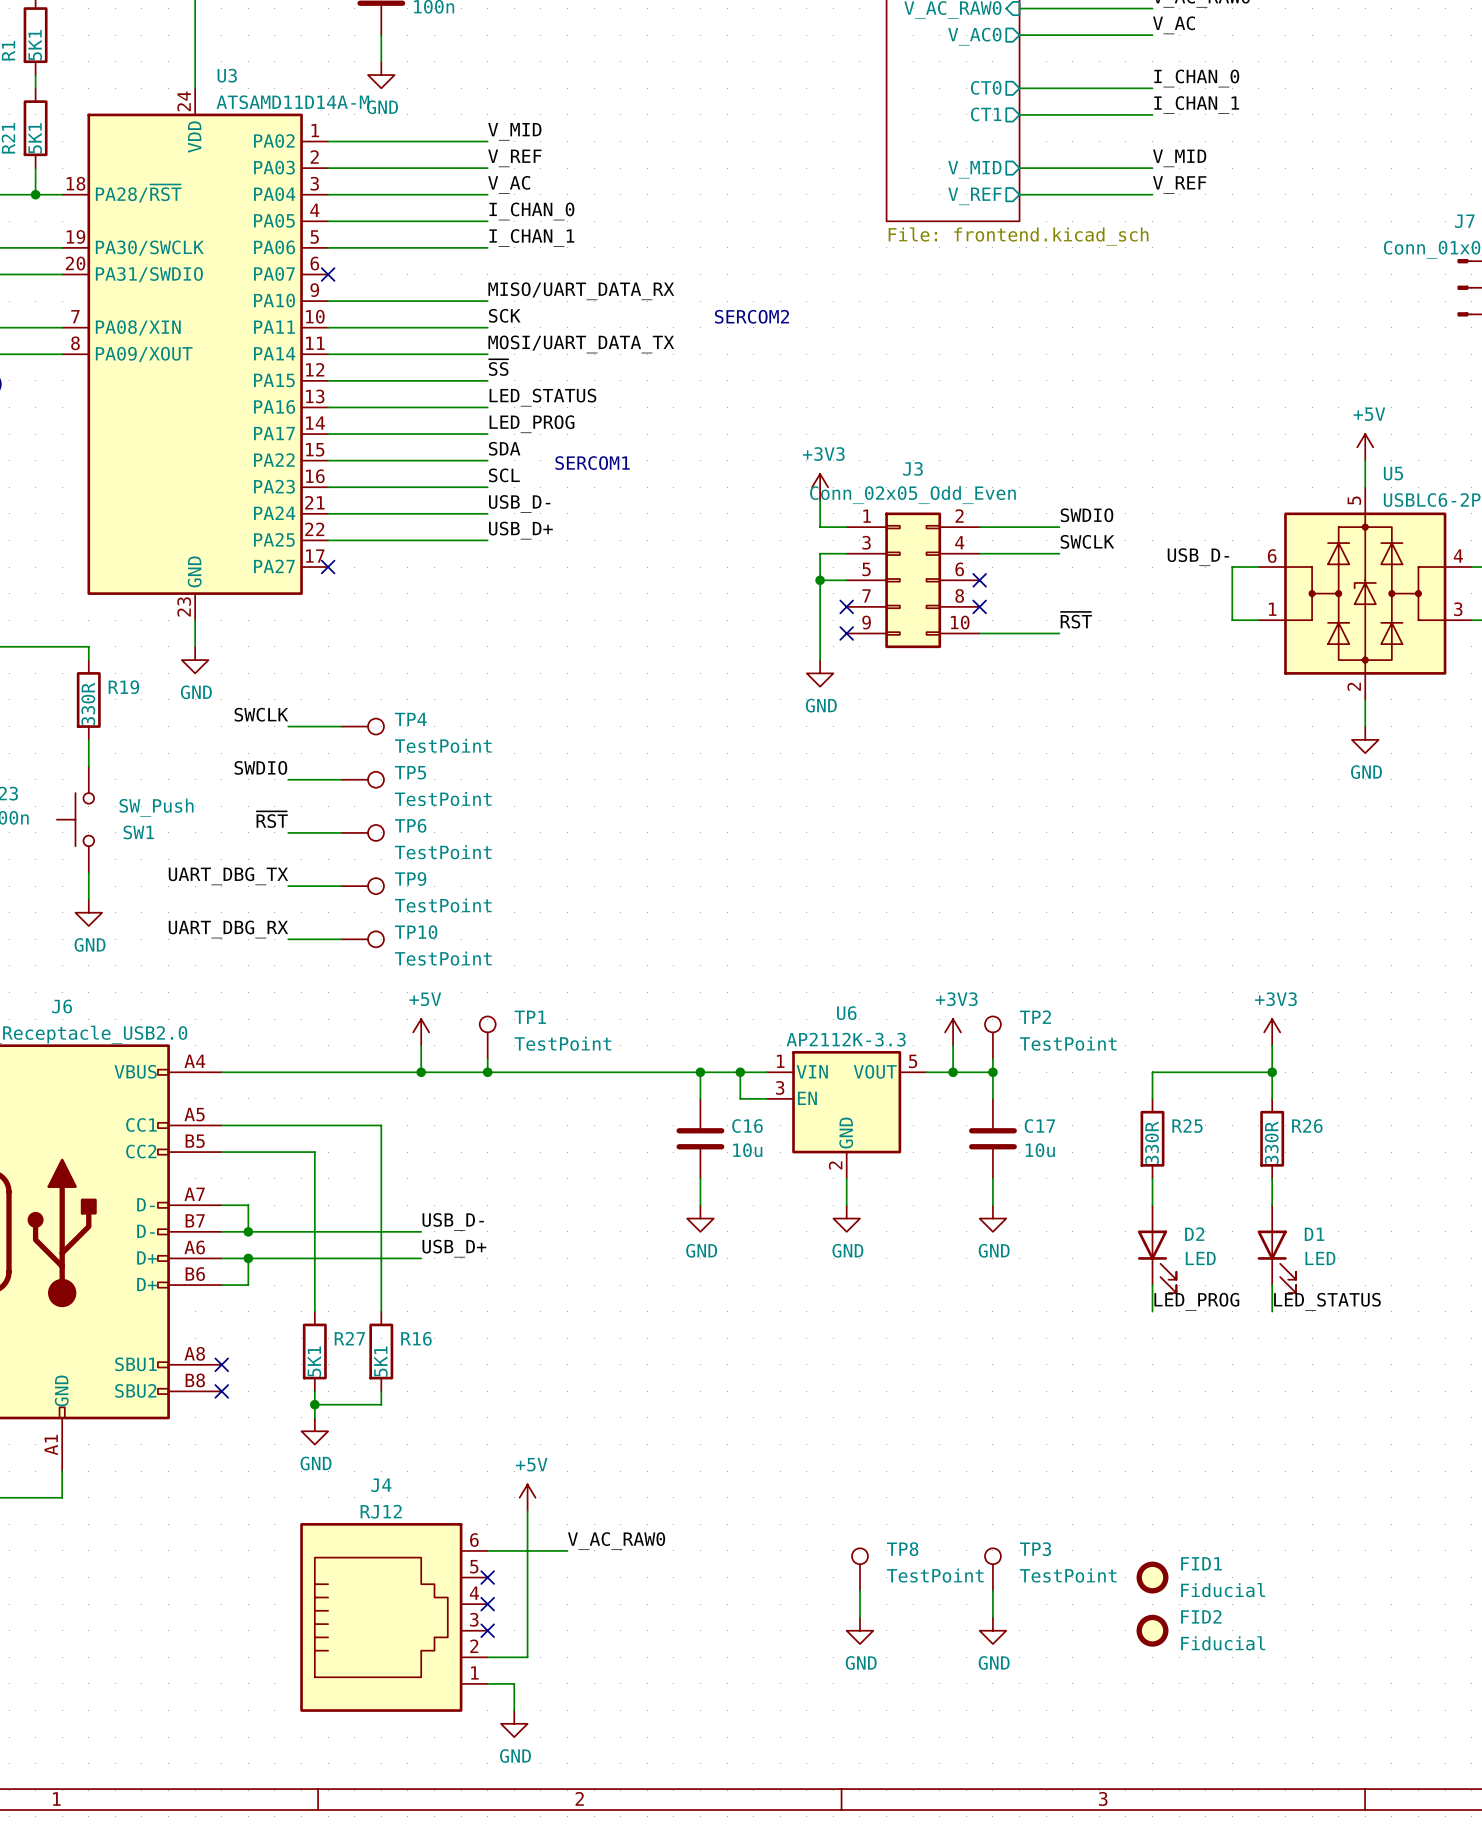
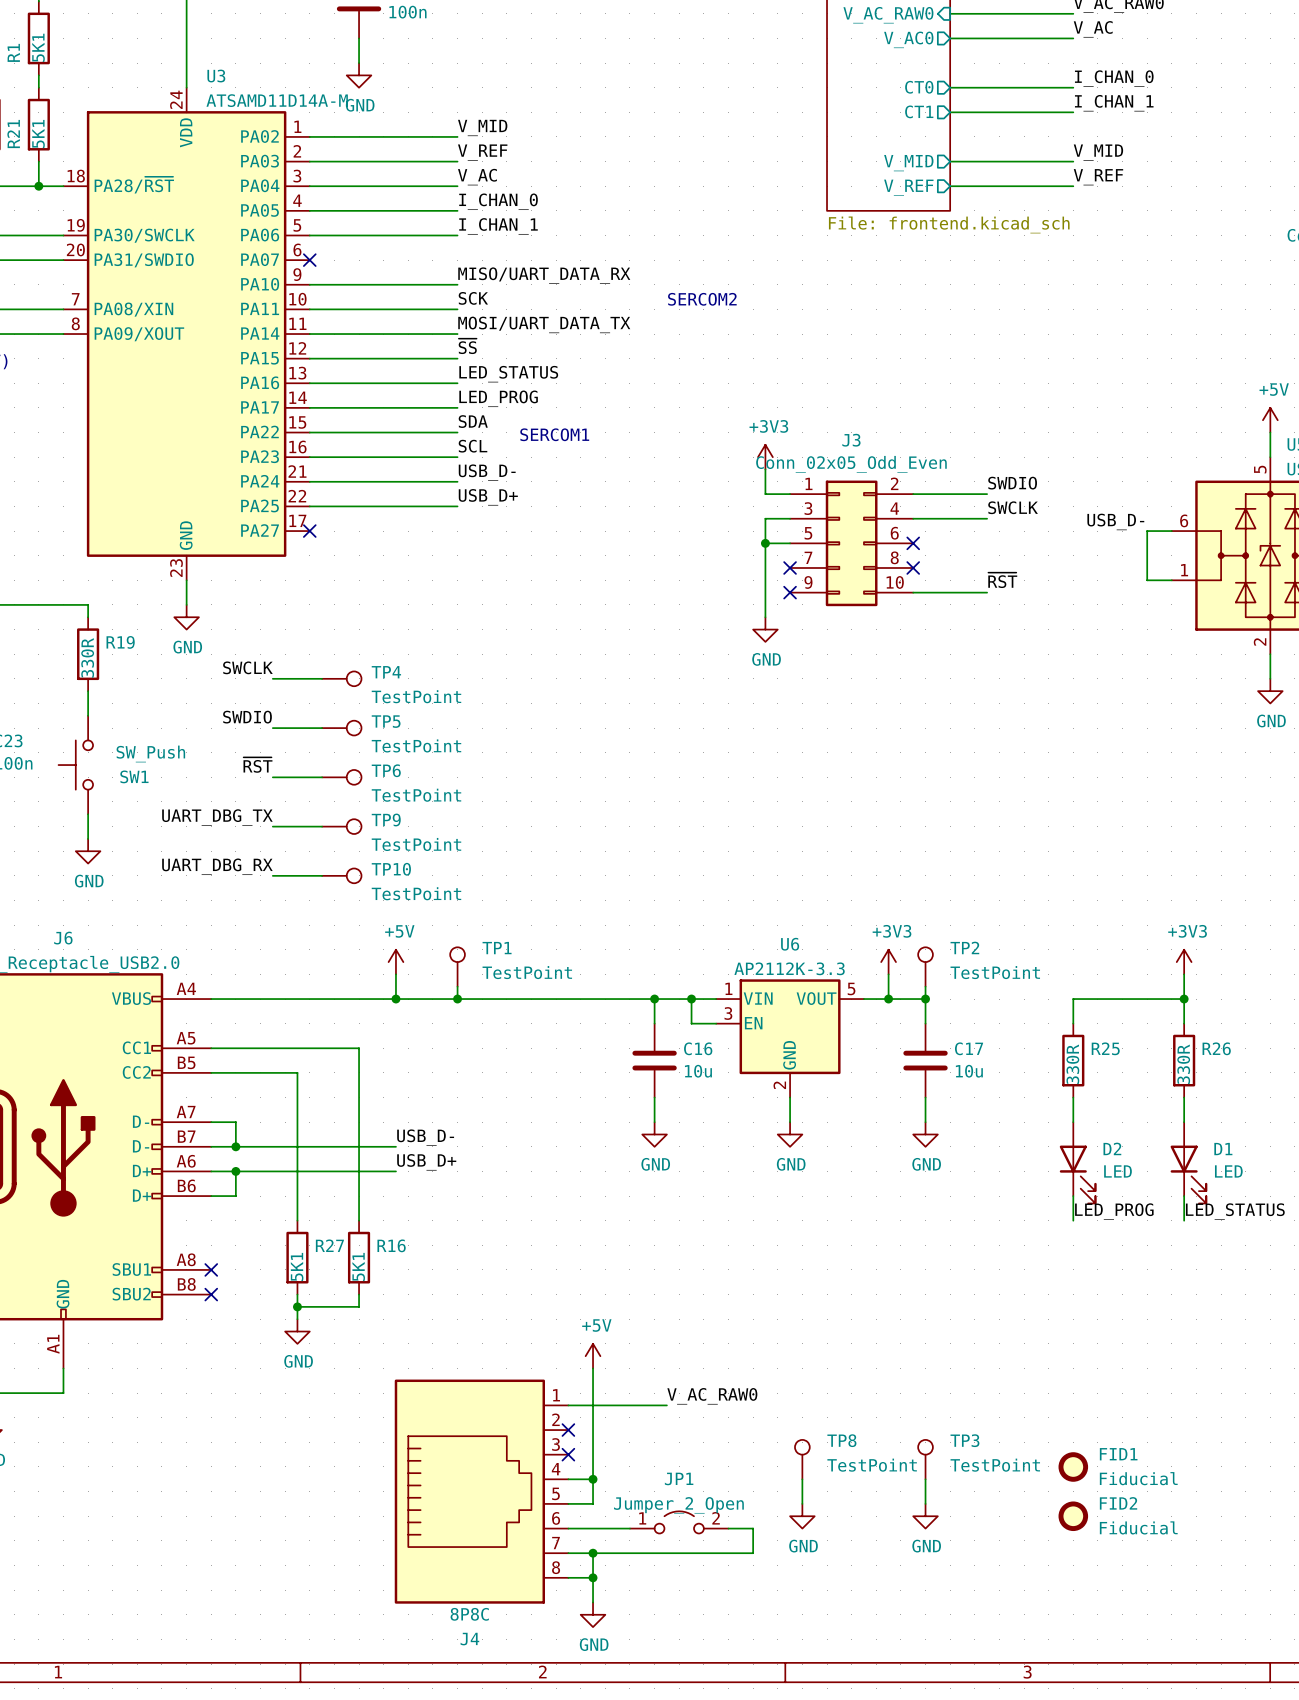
wire: none -> (593, 1368) (593, 1503) (568, 1503)
J4 name position: J4 (381, 1485) -> J4 (469, 1639)
power symbol position: +5V (527, 1497) -> +5V (593, 1356)
J4 value: RJ12 (381, 1511) -> 8P8C (469, 1614)
wire: none -> (568, 1405) (666, 1405)
J4 symbol: [300, 1523, 488, 1712] -> [394, 1379, 569, 1604]
no-connect mark: none -> (568, 1430)
label position: V_AC_RAW0 (616, 1541) -> V_AC_RAW0 (712, 1396)
no-connect mark: none -> (568, 1454)
no-connect mark: (487, 1577) -> none
wire: none -> (568, 1479) (593, 1479)
junction: none -> (593, 1479)
no-connect mark: (487, 1604) -> none
no-connect mark: (487, 1630) -> none
JP1: none -> Jumper_2_Open (679, 1522)
wire: none -> (568, 1528) (629, 1528)
wire: none -> (728, 1528) (753, 1528) (753, 1553) (568, 1553)
wire: none -> (593, 1553) (593, 1602)
junction: none -> (593, 1553)
wire: none -> (568, 1577) (593, 1577)
junction: none -> (593, 1577)
power symbol position: GND (514, 1723) -> GND (593, 1614)

